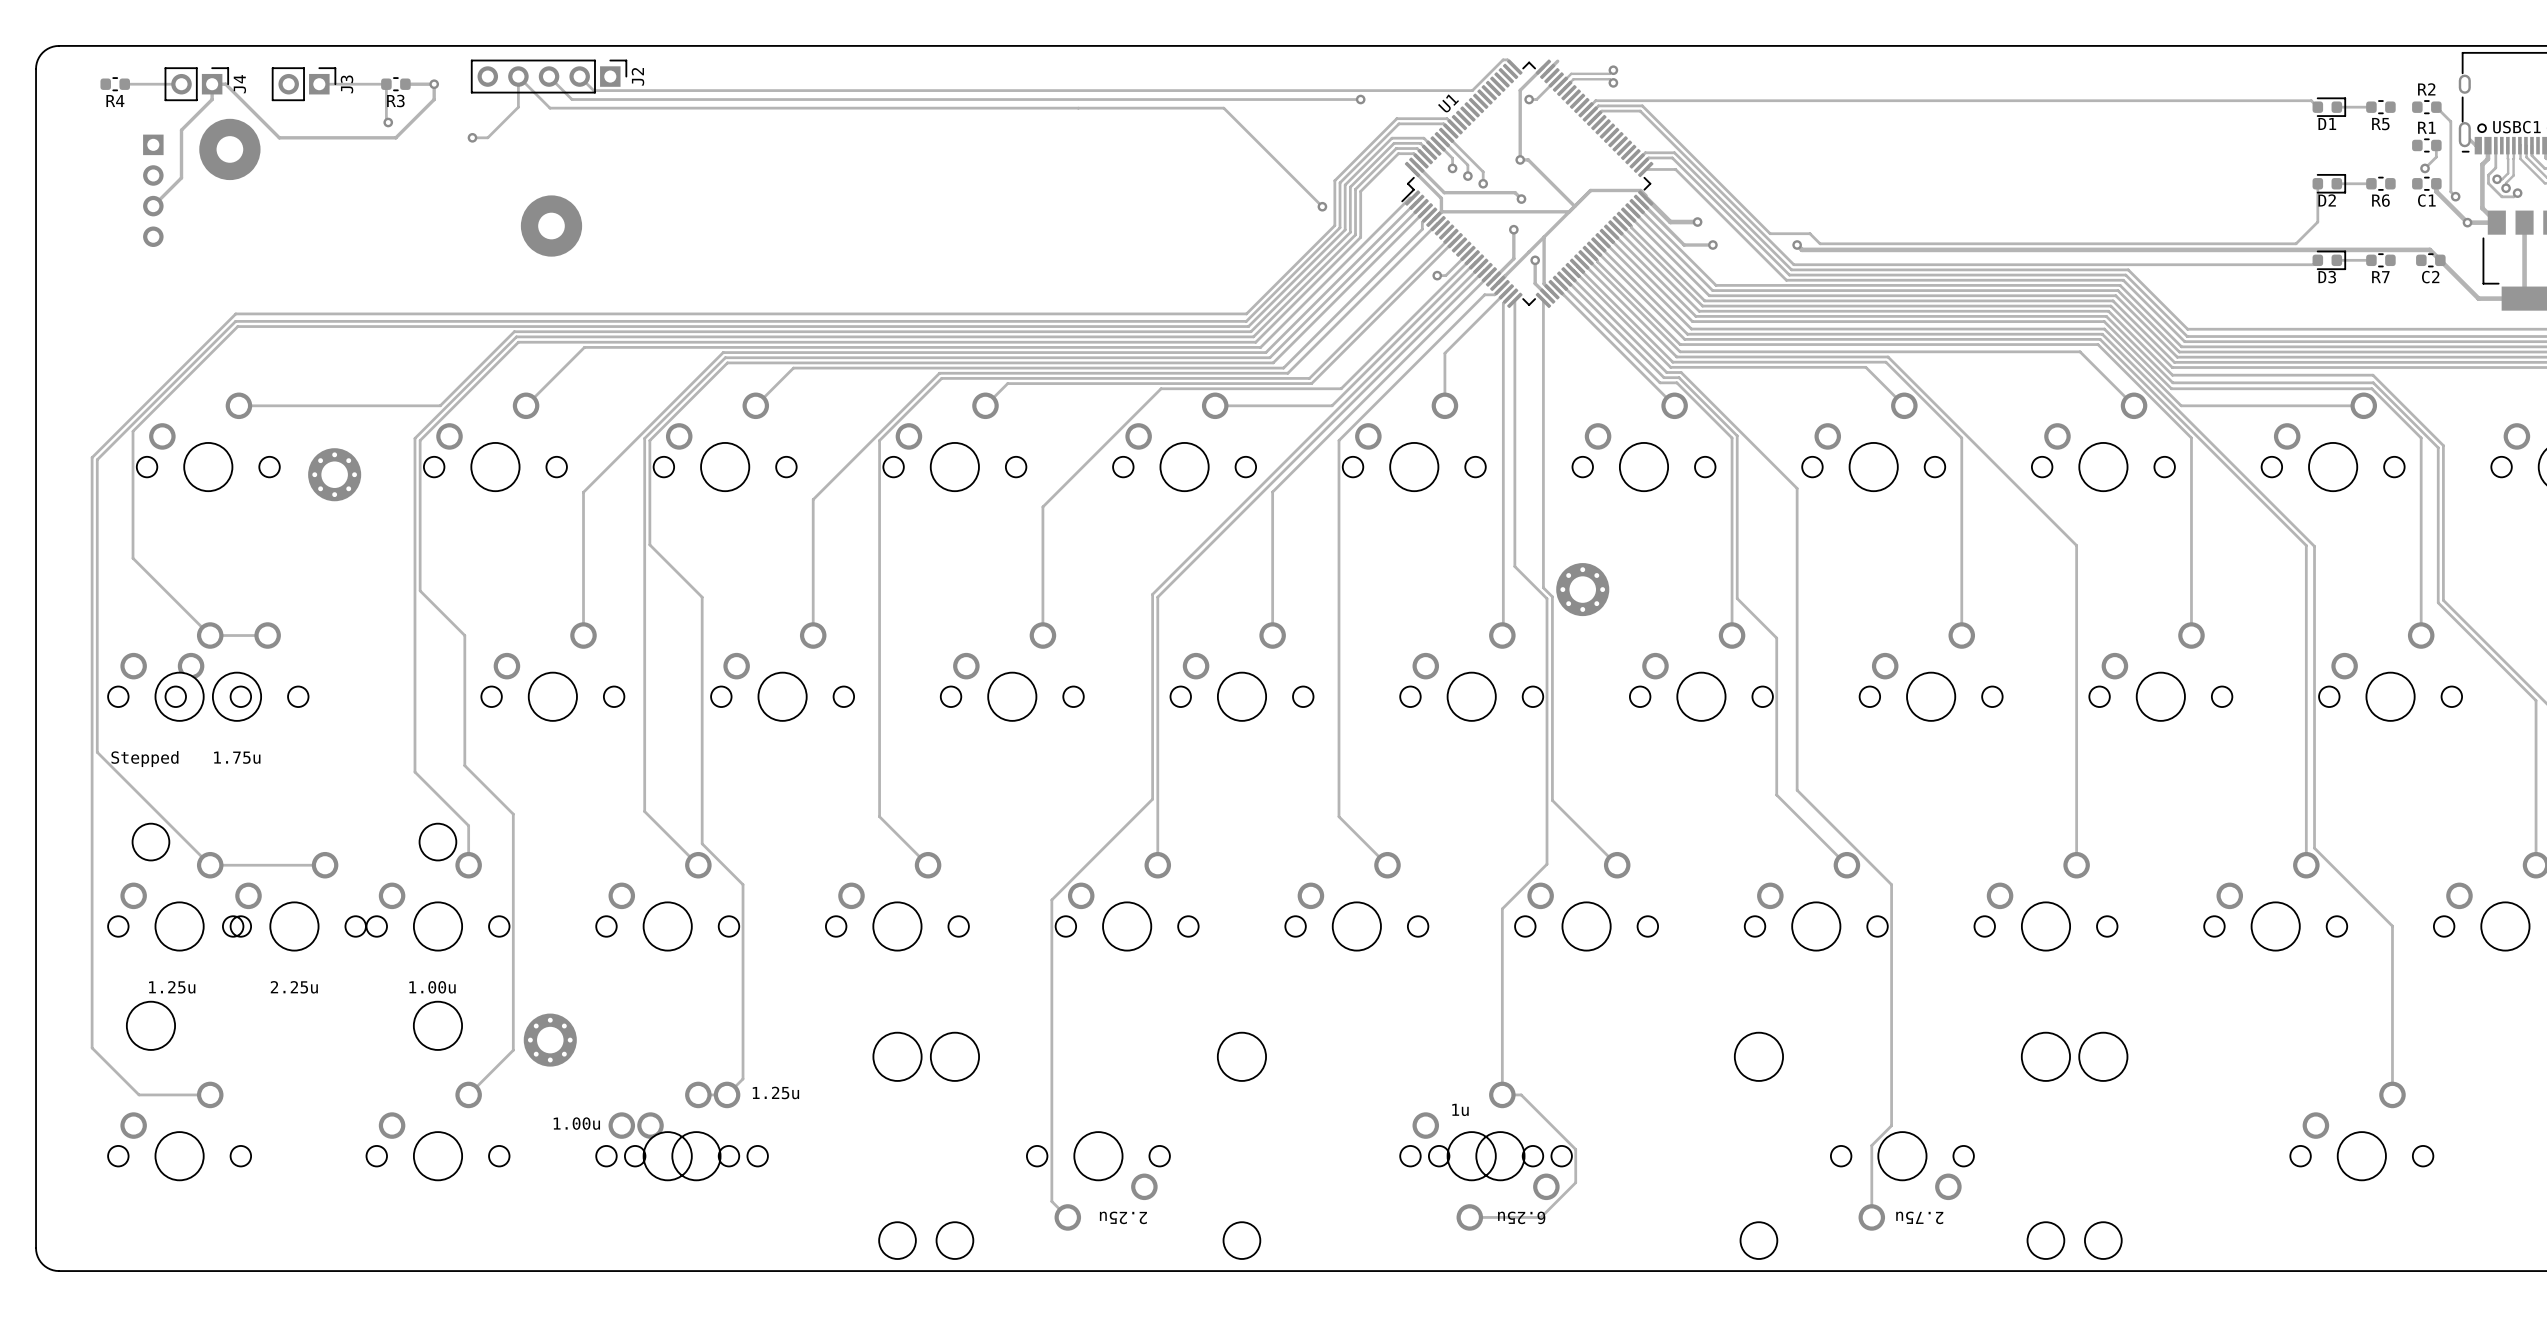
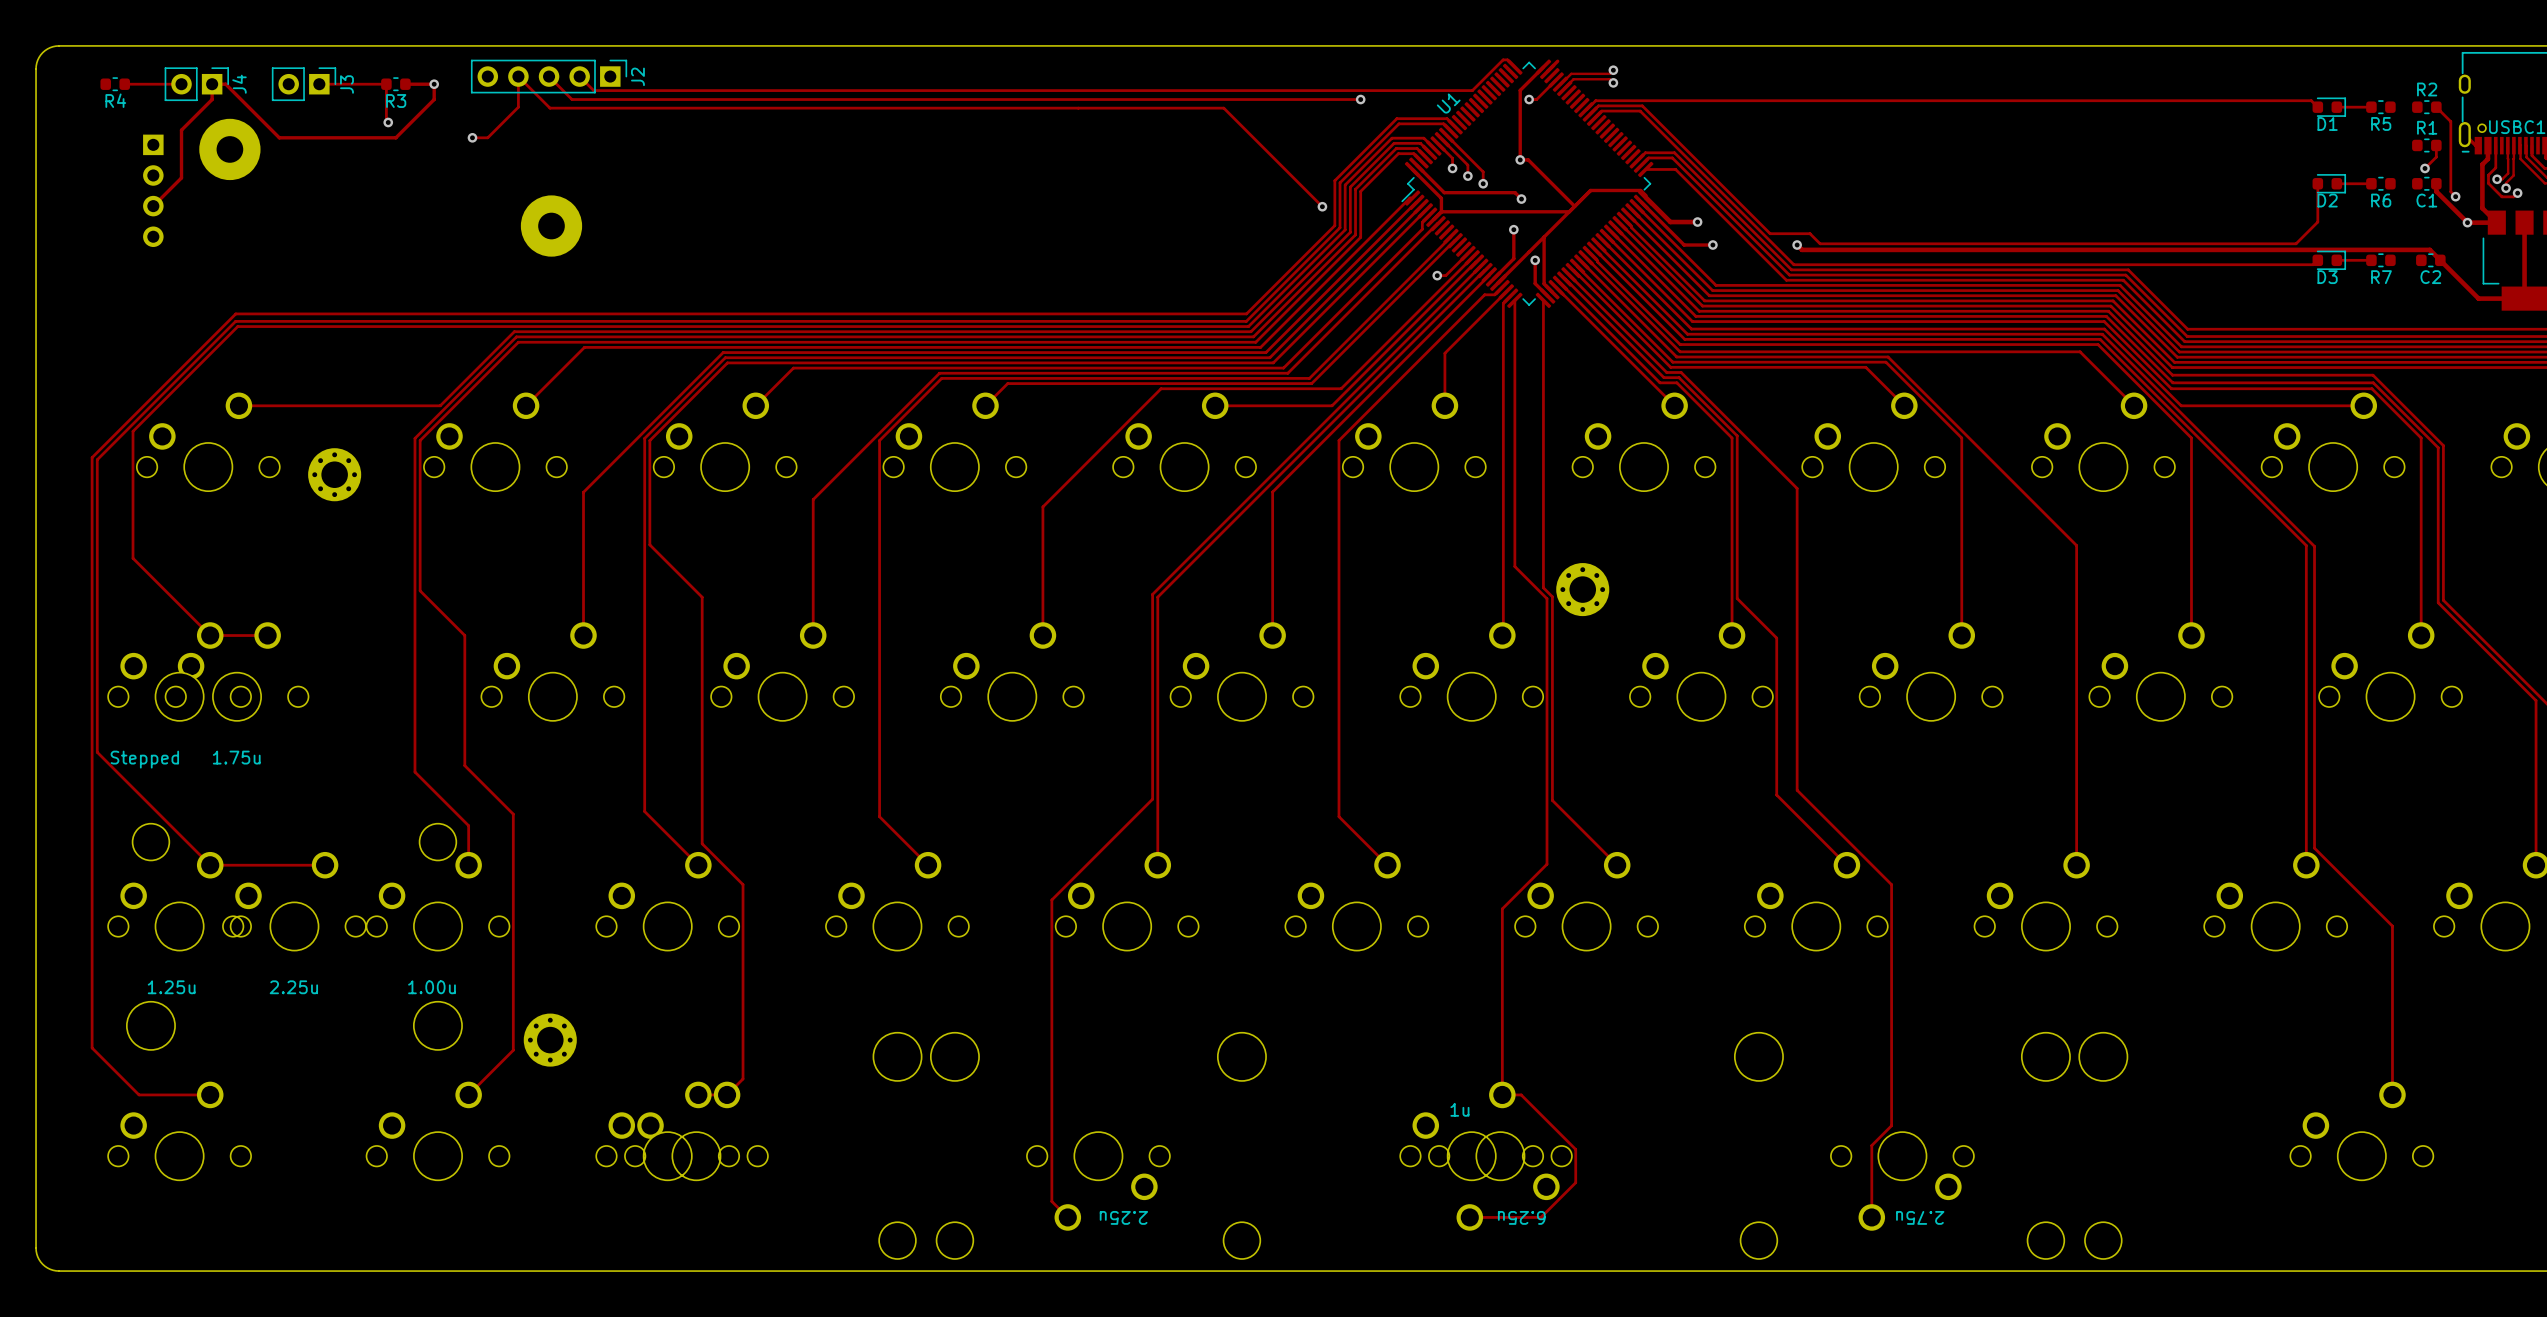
text: 1.25u (775, 1092) -> none
text: 1.00u (576, 1123) -> none

